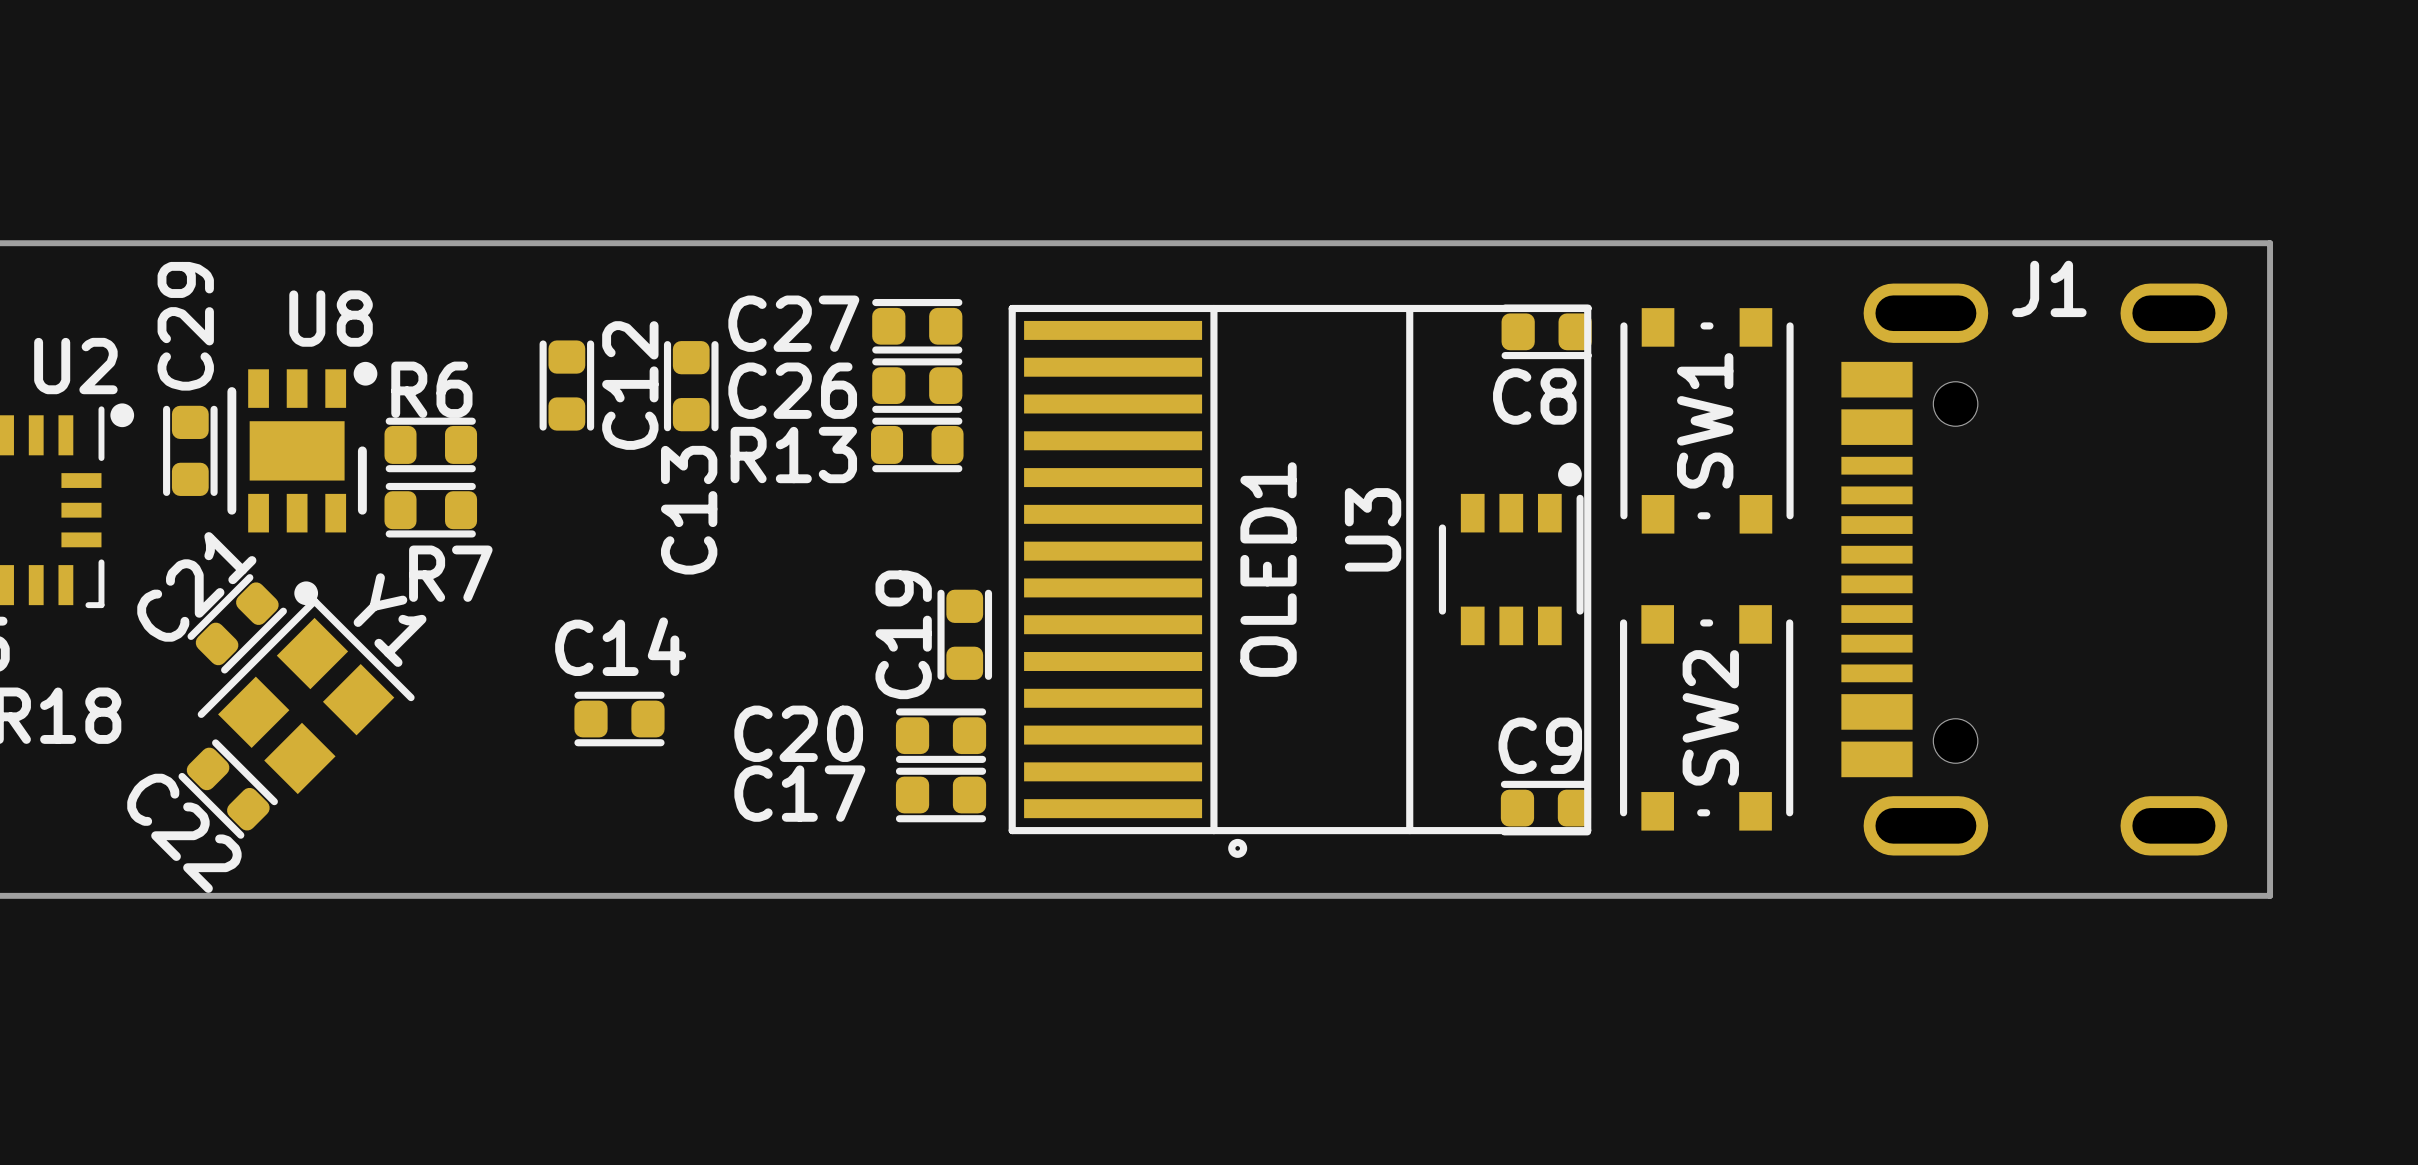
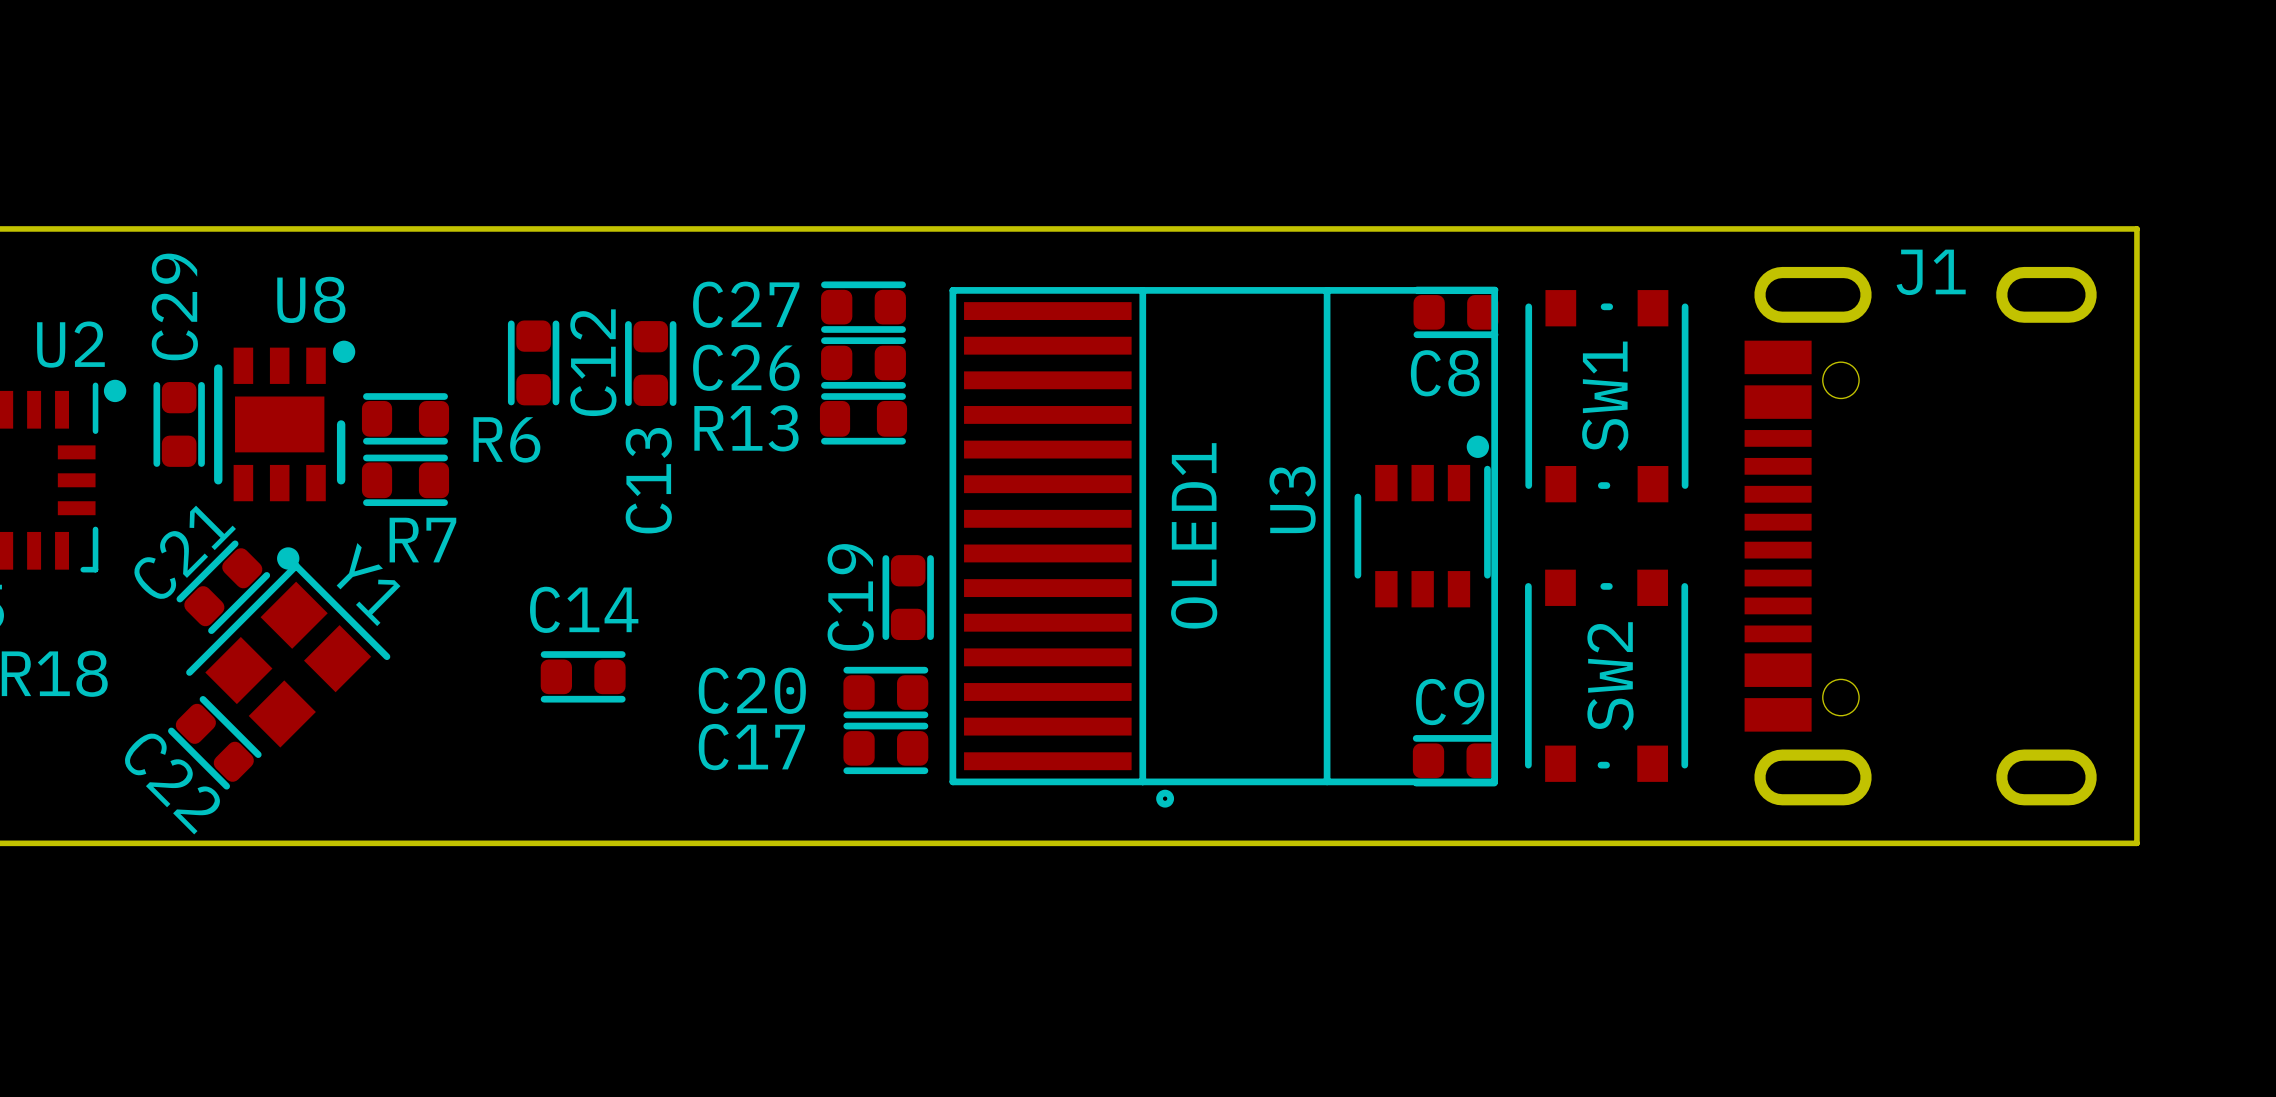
J1 footprint: [1841, 283, 2228, 856] -> [1744, 266, 2097, 806]
R6 name position: R6 (431, 389) -> R6 (506, 439)

